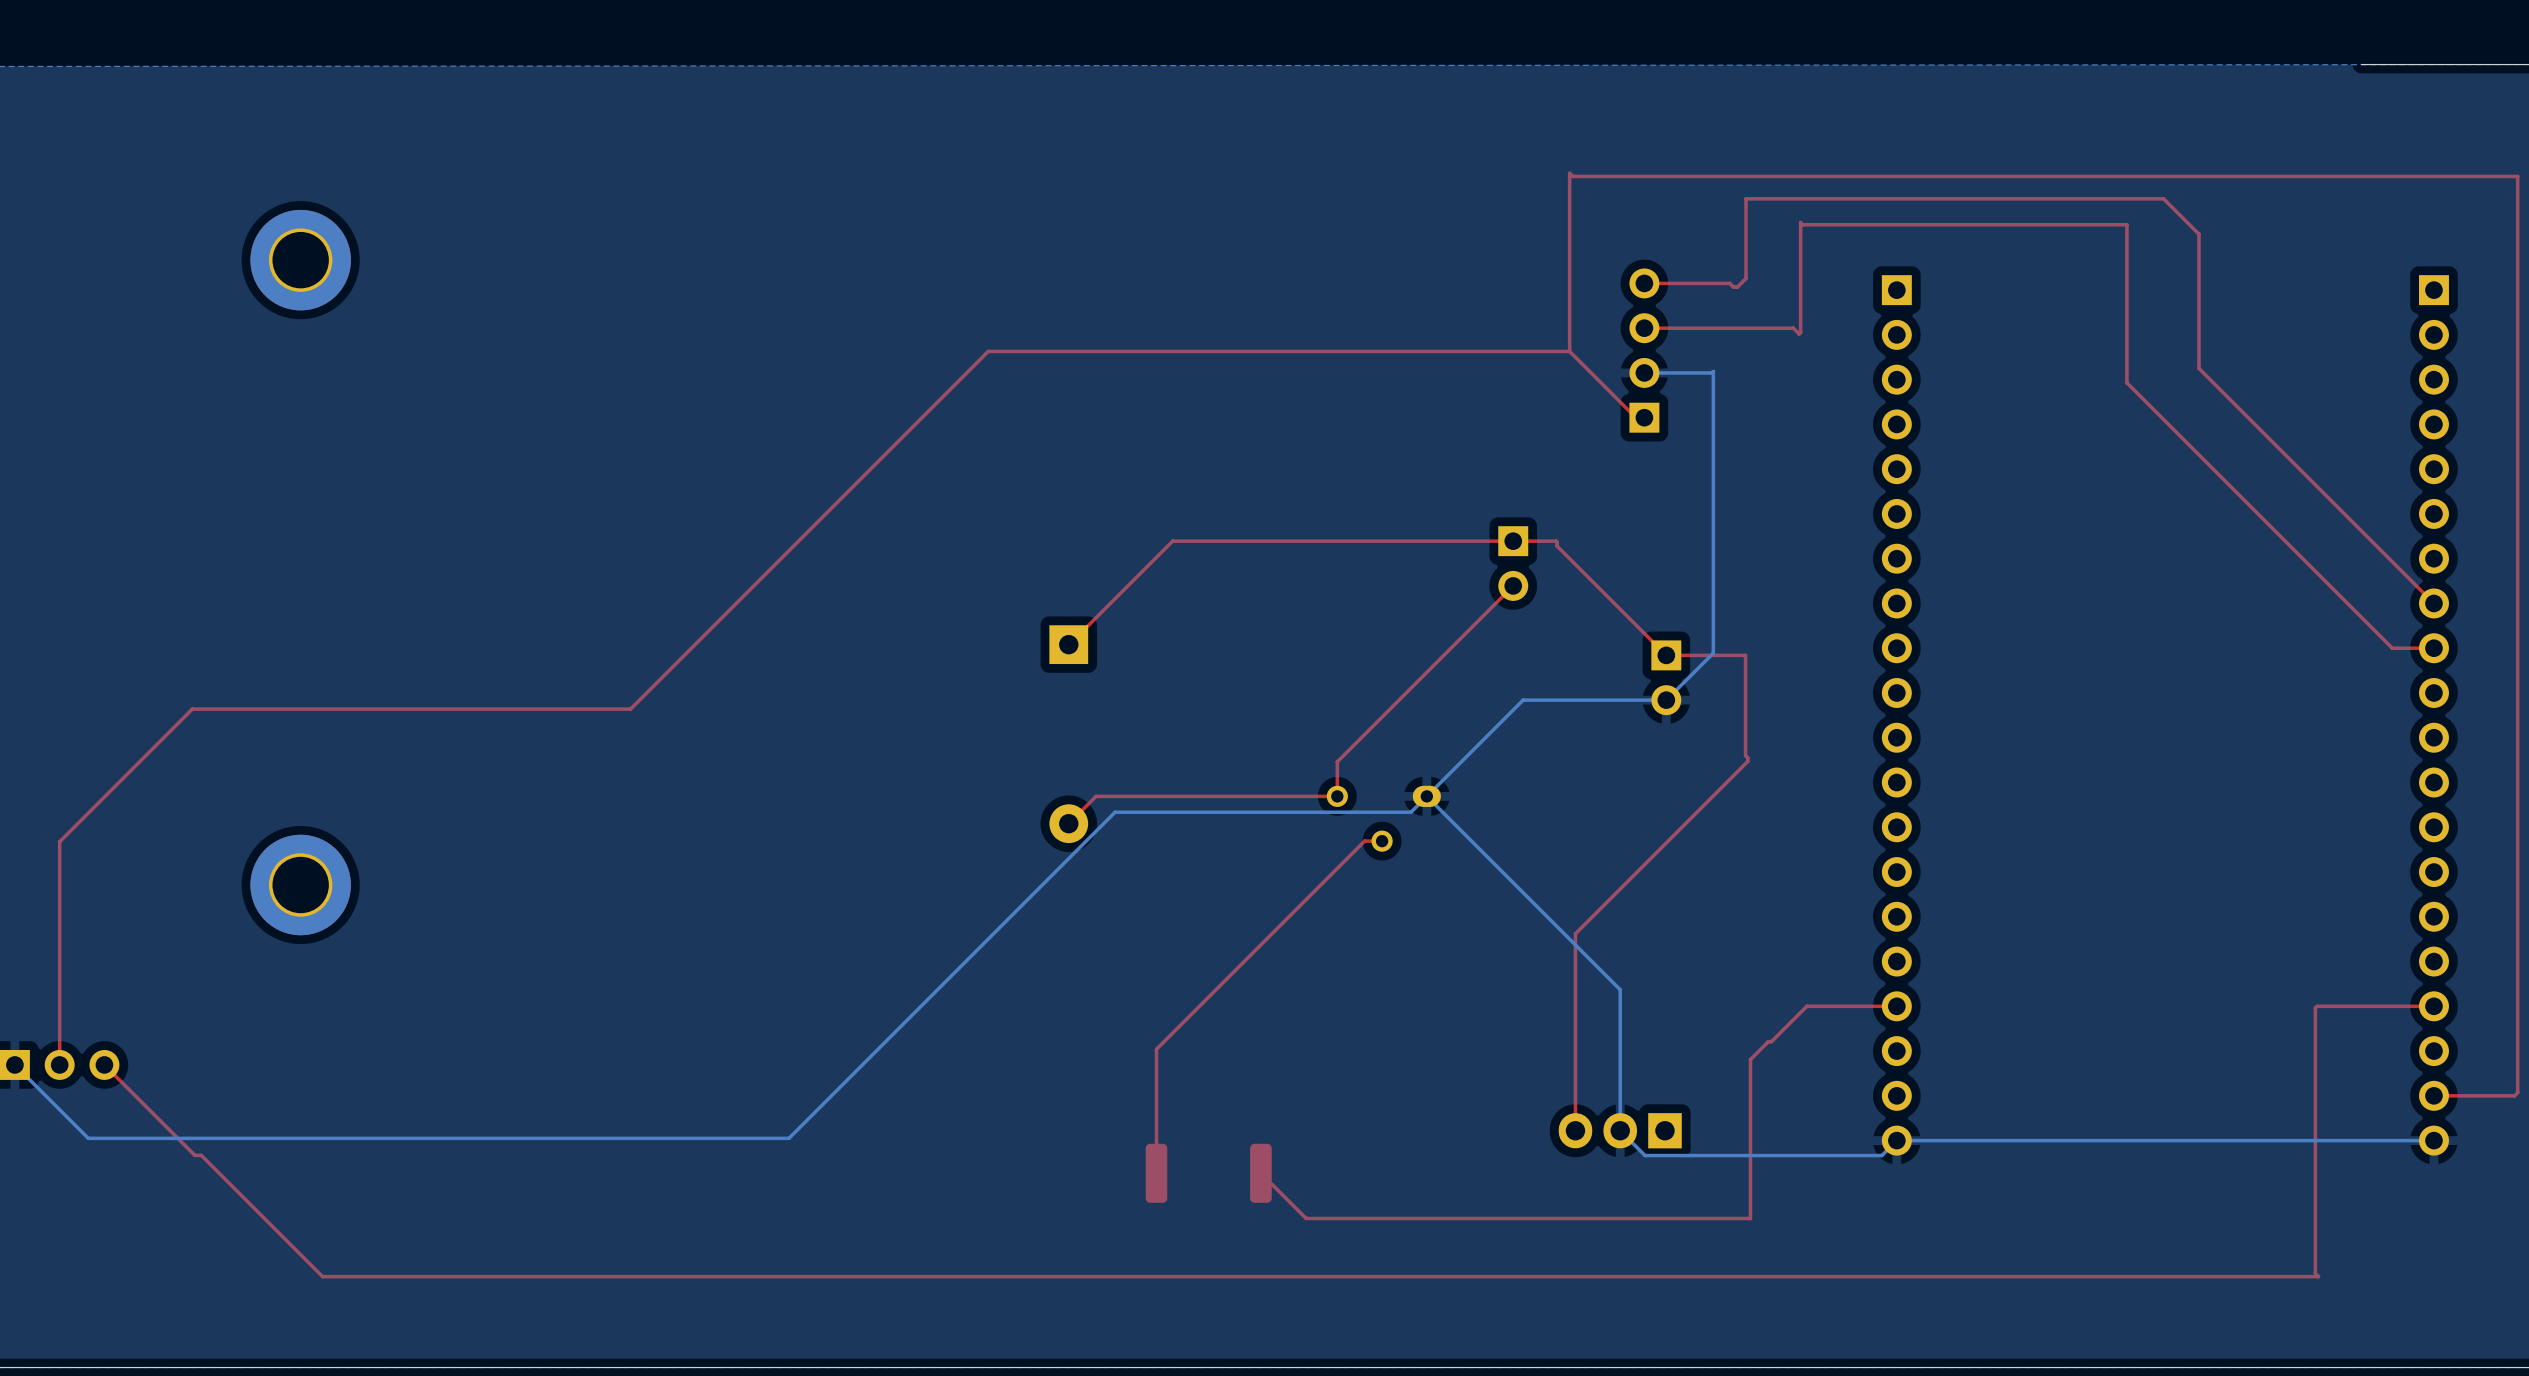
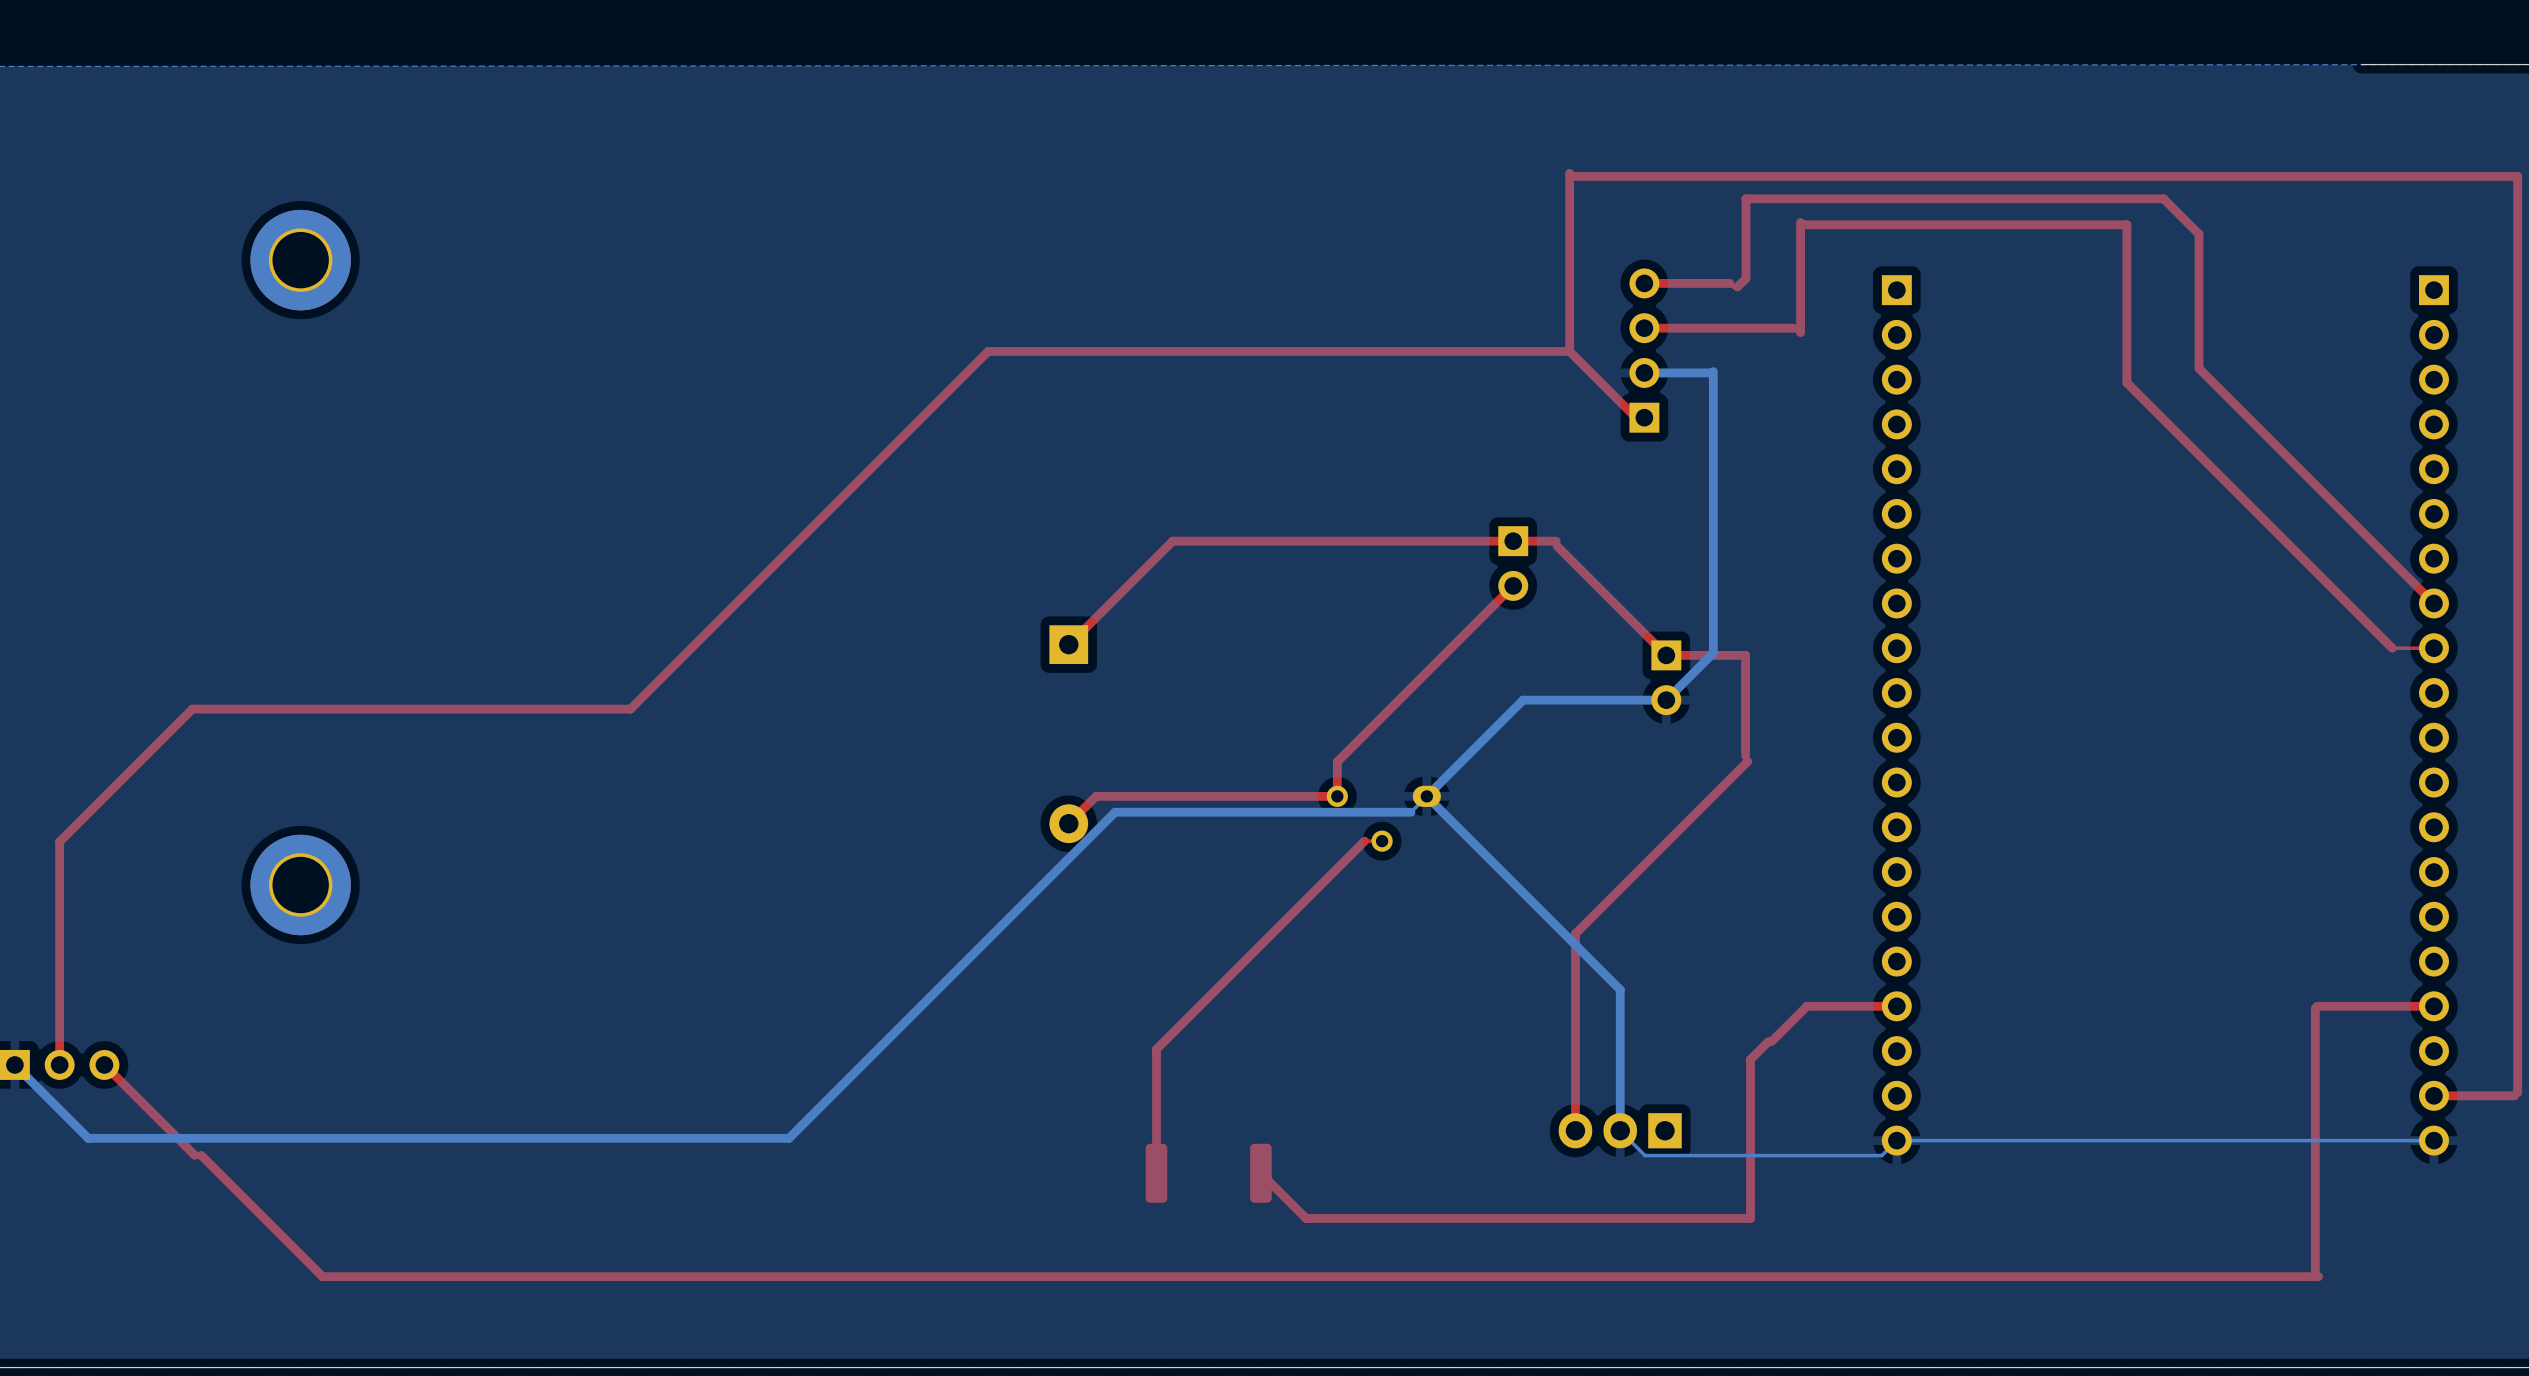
top track width: thin (1569, 173) (1569, 351) -> thick (1569, 173) (1569, 351)
top track width: thin (1572, 176) (2517, 176) (2517, 1092) -> thick (1572, 176) (2517, 176) (2517, 1092)
top track width: thin (1800, 222) (1800, 332) -> thick (1800, 222) (1800, 332)
top track width: thin (1802, 224) (2126, 224) (2126, 382) (2392, 648) -> thick (1802, 224) (2126, 224) (2126, 382) (2392, 648)
top track width: thin (1729, 283) (1644, 283) -> thick (1729, 283) (1644, 283)
top track width: thin (1737, 287) (1746, 278) (1746, 198) (2163, 198) (2198, 234) (2198, 368) (2433, 603) -> thick (1737, 287) (1746, 278) (1746, 198) (2163, 198) (2198, 234) (2198, 368) (2433, 603)
top track width: thin (1793, 328) (1644, 328) -> thick (1793, 328) (1644, 328)
top track width: thin (1569, 351) (1635, 417) -> thick (1569, 351) (1635, 417)
top track width: thin (1569, 351) (988, 351) (630, 709) (192, 709) (59, 841) (59, 1064) -> thick (1569, 351) (988, 351) (630, 709) (192, 709) (59, 841) (59, 1064)
bottom track width: thin (1713, 371) (1713, 653) (1666, 700) (1523, 700) (1426, 796) (1620, 989) (1620, 1130) -> thick (1713, 371) (1713, 653) (1666, 700) (1523, 700) (1426, 796) (1620, 989) (1620, 1130)
bottom track width: thin (1711, 372) (1644, 372) -> thick (1711, 372) (1644, 372)
top track width: thin (1556, 541) (1172, 541) (1069, 644) -> thick (1556, 541) (1172, 541) (1069, 644)
top track width: thin (1557, 546) (1666, 655) (1745, 655) (1745, 755) -> thick (1557, 546) (1666, 655) (1745, 655) (1745, 755)
top track width: thin (1513, 585) (1337, 761) (1337, 796) (1096, 796) (1068, 823) -> thick (1513, 585) (1337, 761) (1337, 796) (1096, 796) (1068, 823)
top track width: thin (1747, 761) (1575, 933) (1575, 1130) -> thick (1747, 761) (1575, 933) (1575, 1130)
bottom track width: thin (1411, 812) (1115, 812) (788, 1138) (88, 1138) (14, 1064) -> thick (1411, 812) (1115, 812) (788, 1138) (88, 1138) (14, 1064)
top track width: thin (1364, 841) (1156, 1049) (1156, 1173) -> thick (1364, 841) (1156, 1049) (1156, 1173)
top track width: thin (1896, 1006) (1806, 1006) (1771, 1041) -> thick (1896, 1006) (1806, 1006) (1771, 1041)
top track width: thin (2433, 1006) (2317, 1006) -> thick (2433, 1006) (2317, 1006)
top track width: thin (2315, 1008) (2315, 1273) -> thick (2315, 1008) (2315, 1273)
top track width: thin (1768, 1041) (1750, 1059) (1750, 1218) (1306, 1218) (1260, 1173) -> thick (1768, 1041) (1750, 1059) (1750, 1218) (1306, 1218) (1260, 1173)
top track width: thin (104, 1064) (194, 1155) -> thick (104, 1064) (194, 1155)
top track width: thin (2514, 1095) (2433, 1095) -> thick (2514, 1095) (2433, 1095)
top track width: thin (201, 1155) (322, 1276) (2318, 1276) -> thick (201, 1155) (322, 1276) (2318, 1276)

